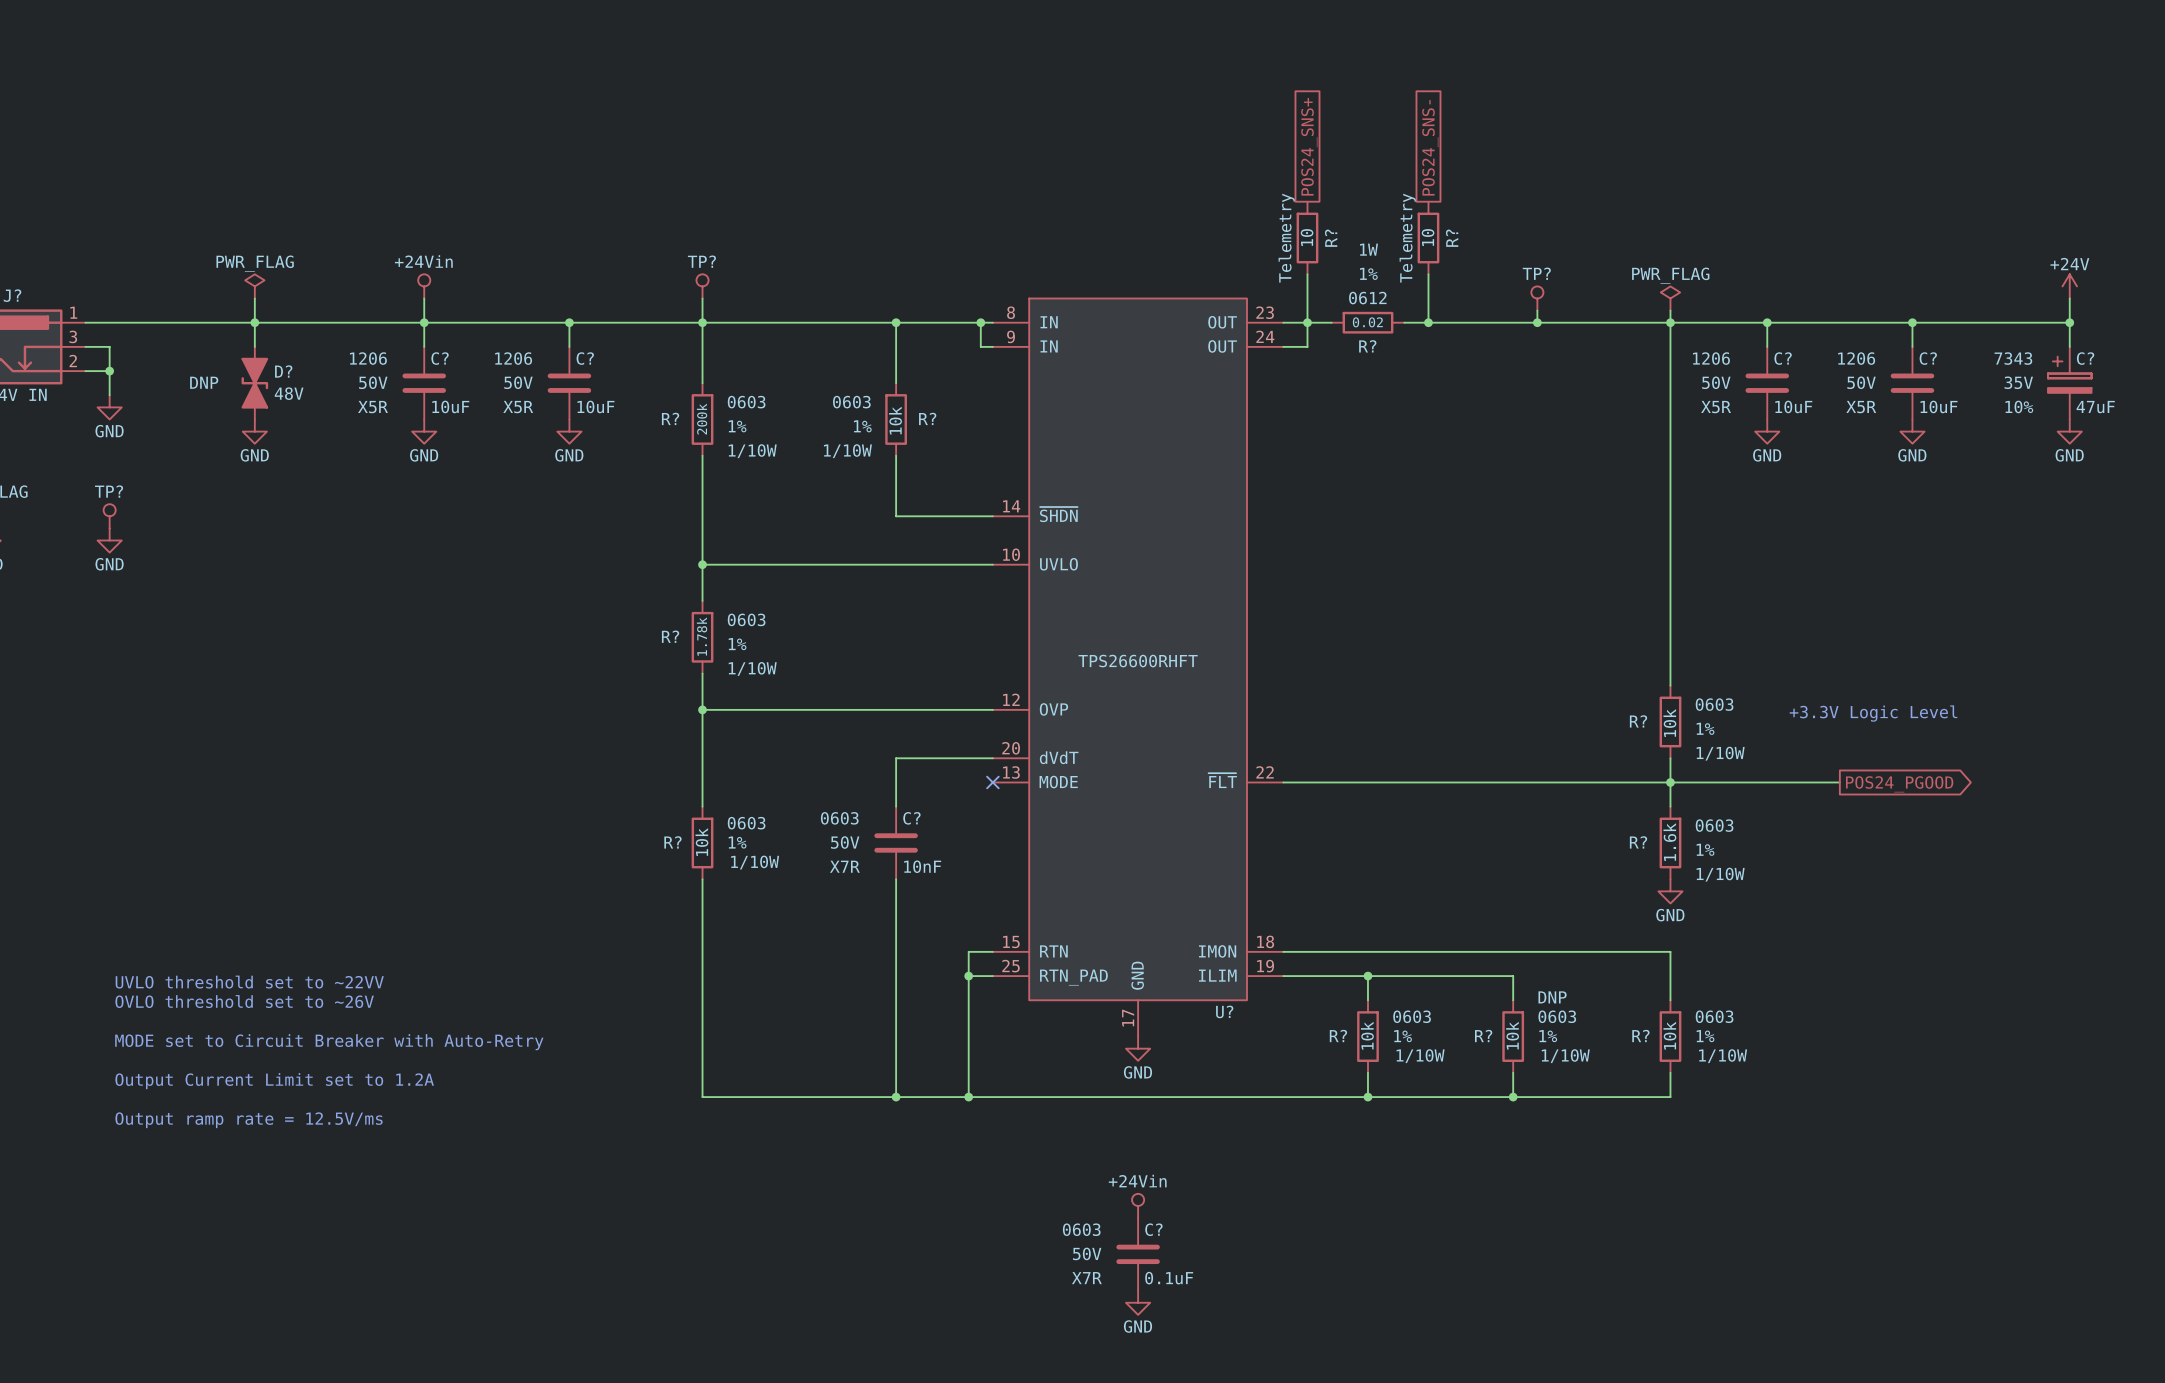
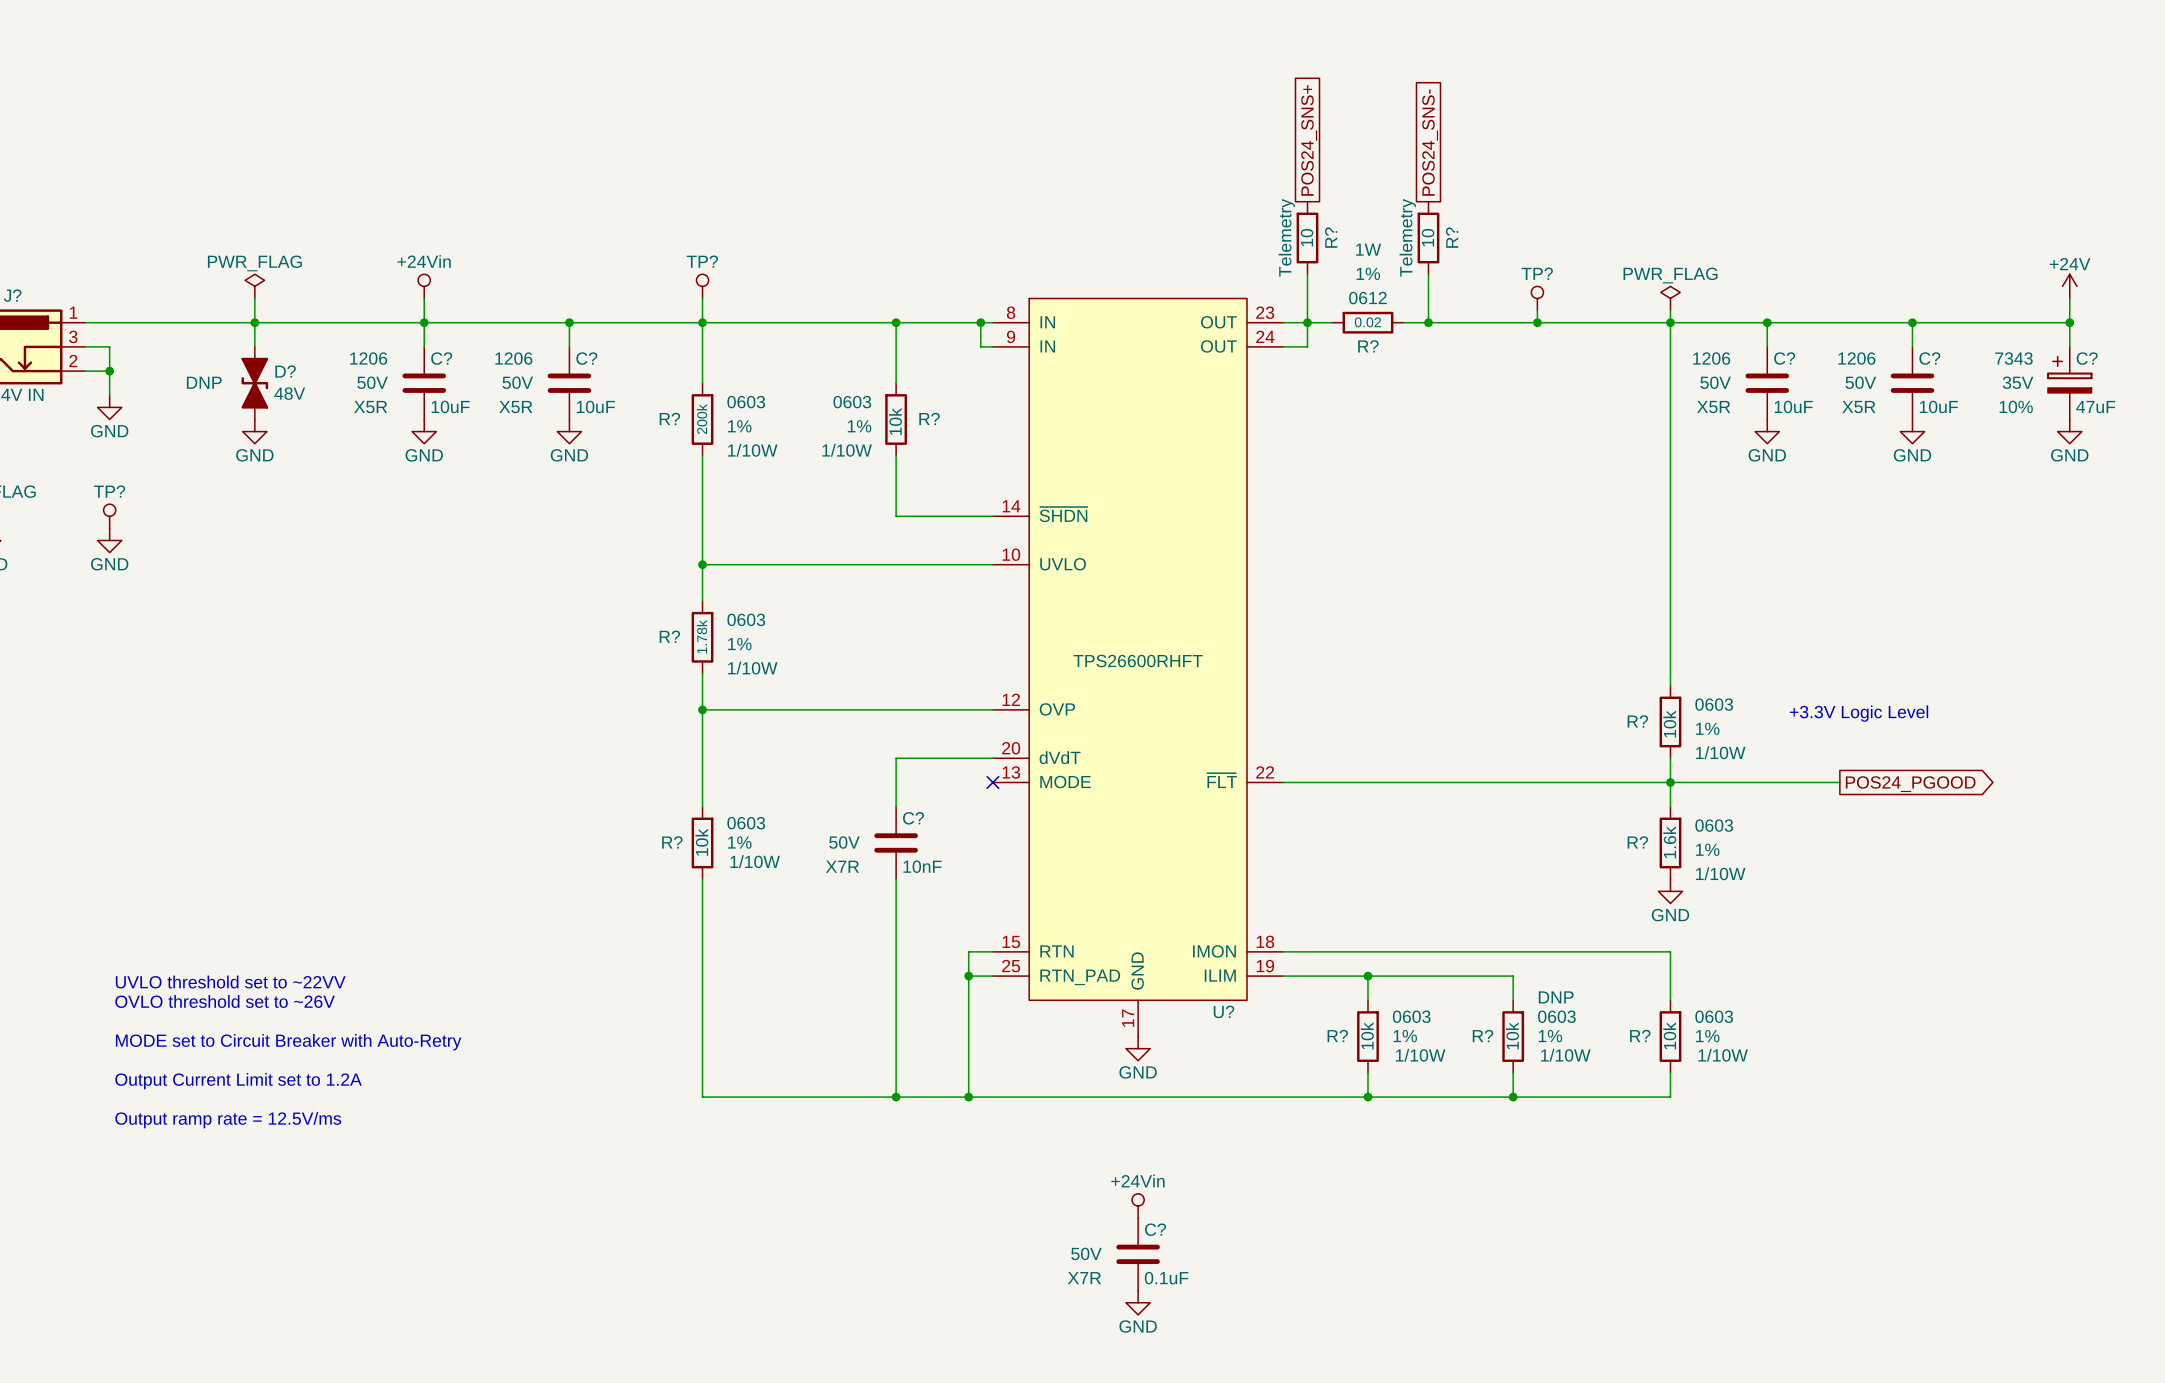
C? text: 0603 (839, 818) -> none
C? text: 0603 (1081, 1229) -> none

